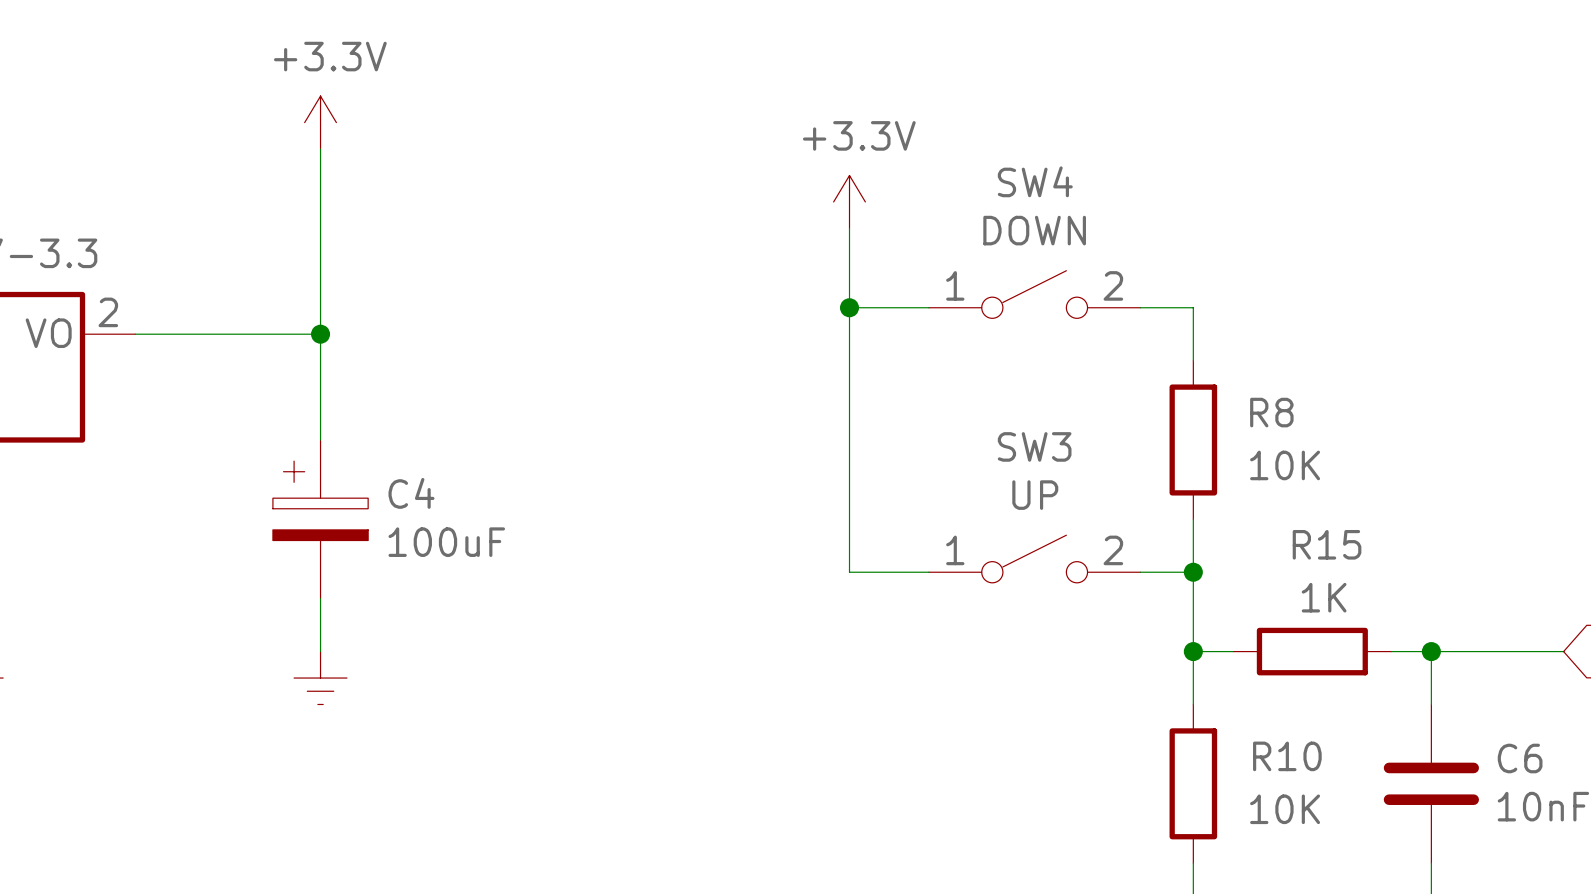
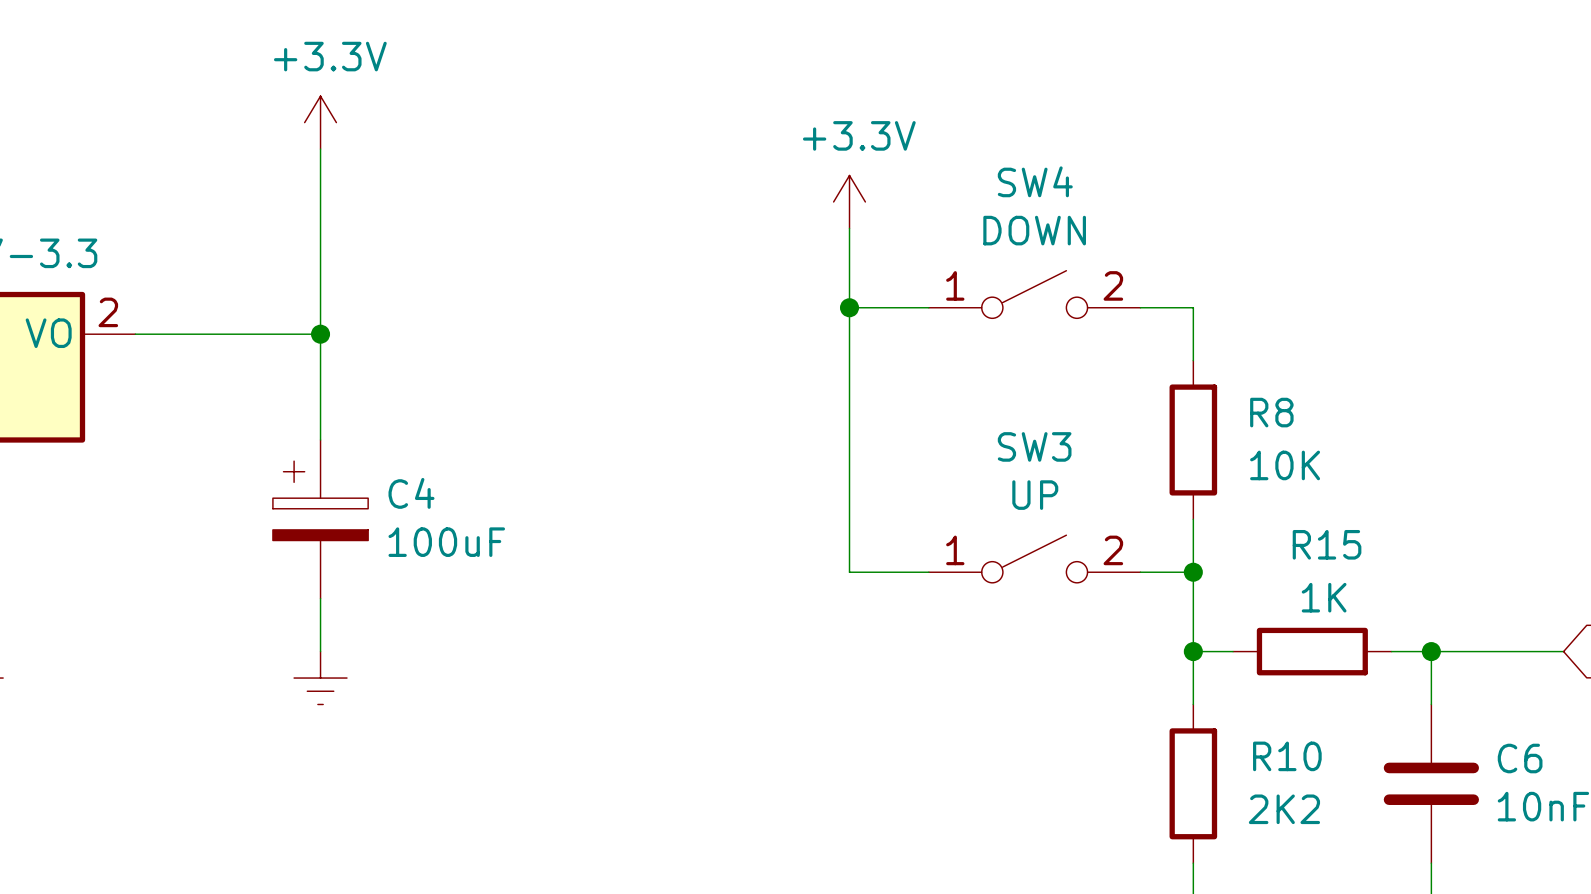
R10 value: 10K (1285, 809) -> 2K2 (1284, 809)

